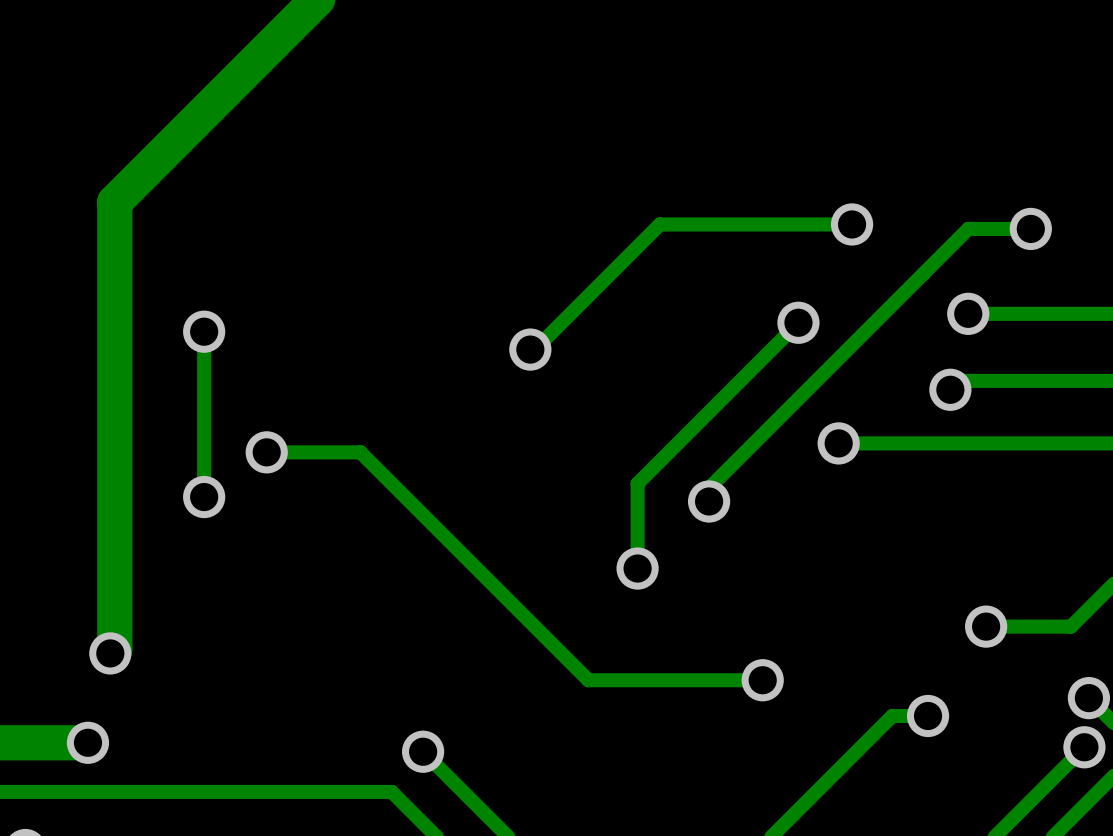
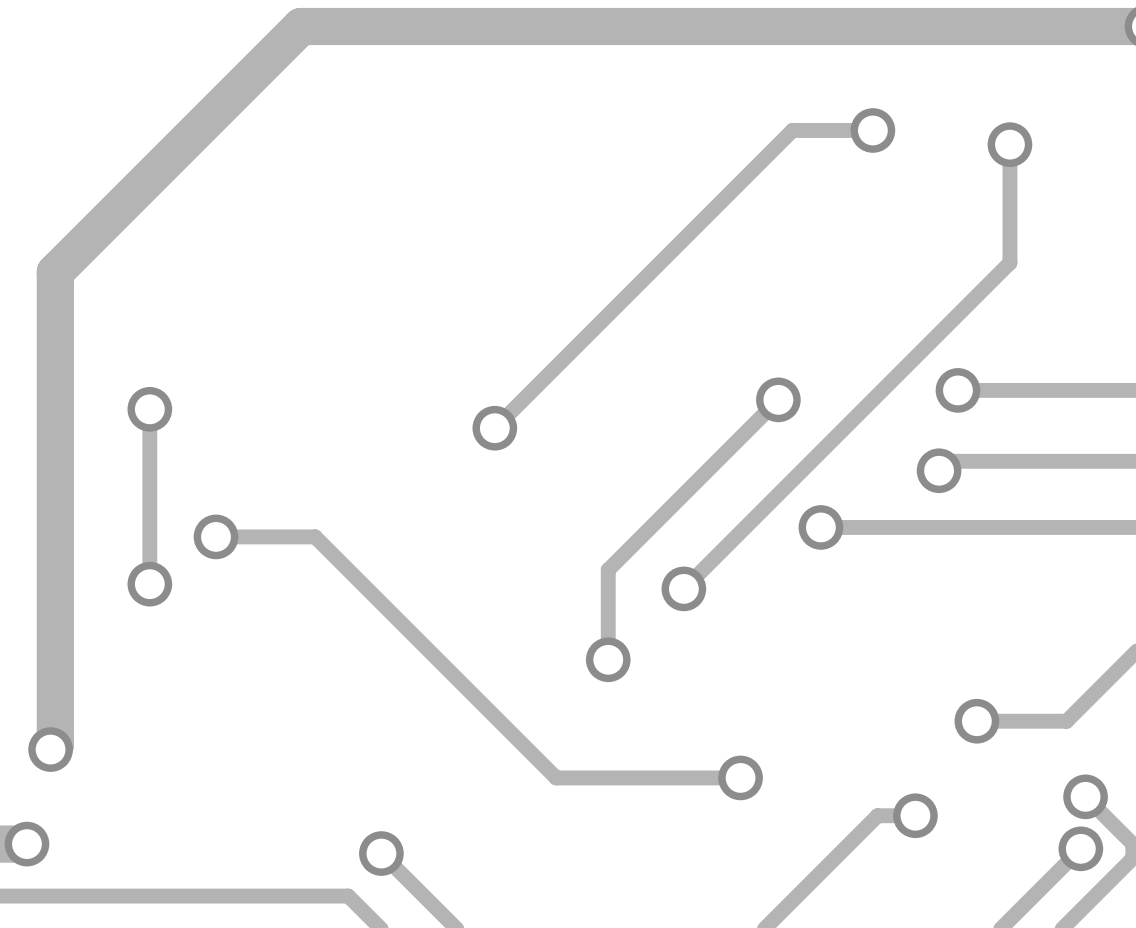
via: none -> (872, 130)
via: none -> (1009, 144)
track: (852, 224) (659, 224) (534, 349) (530, 349) -> (872, 130) (792, 130) (494, 428)
via: (852, 224) -> none
track: (1030, 228) (968, 228) (709, 488) (709, 501) -> (1009, 144) (1009, 262) (683, 588)
via: (1030, 228) -> none

